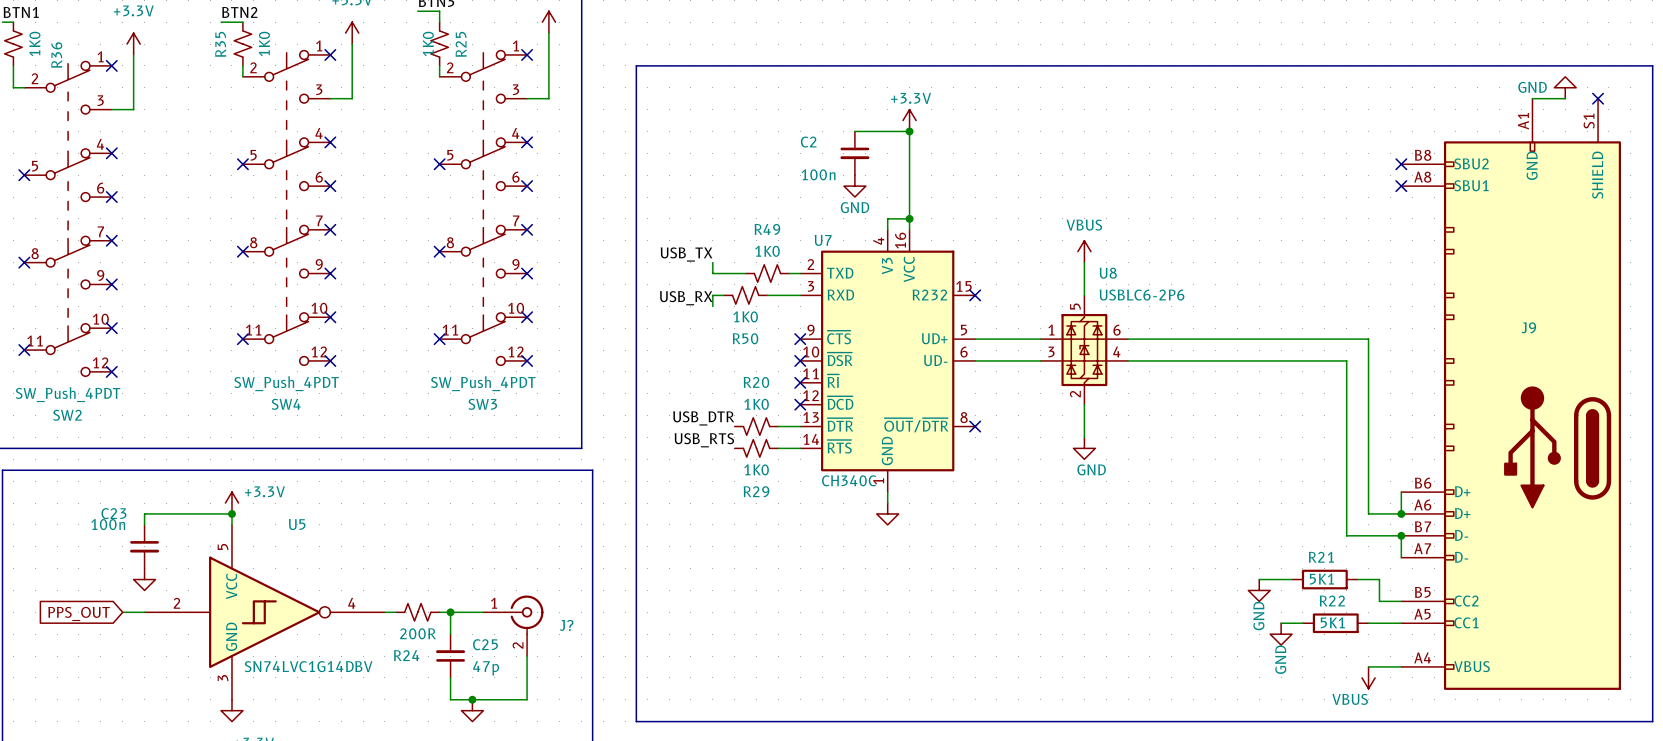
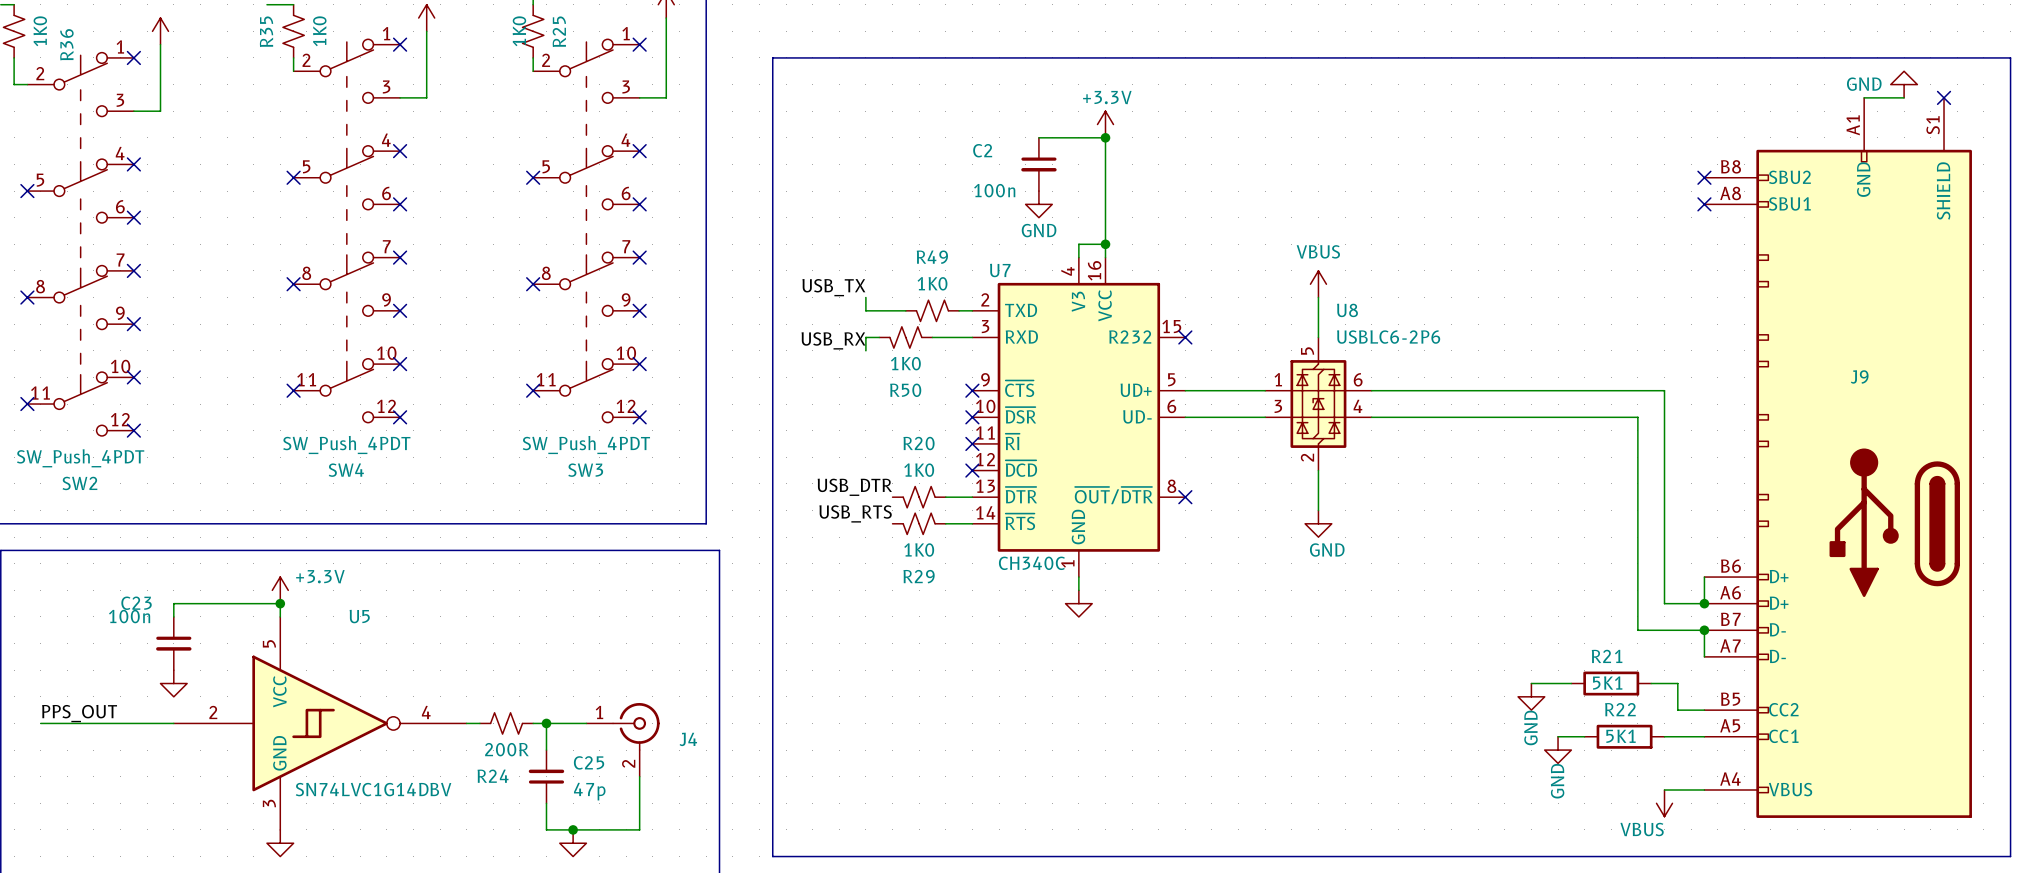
label: none -> PPS_OUT (79, 713)
wire: none -> (40, 723) (147, 723)
global label: PPS_OUT (79, 613) -> none
J? name: J? (566, 625) -> J4 (688, 739)

